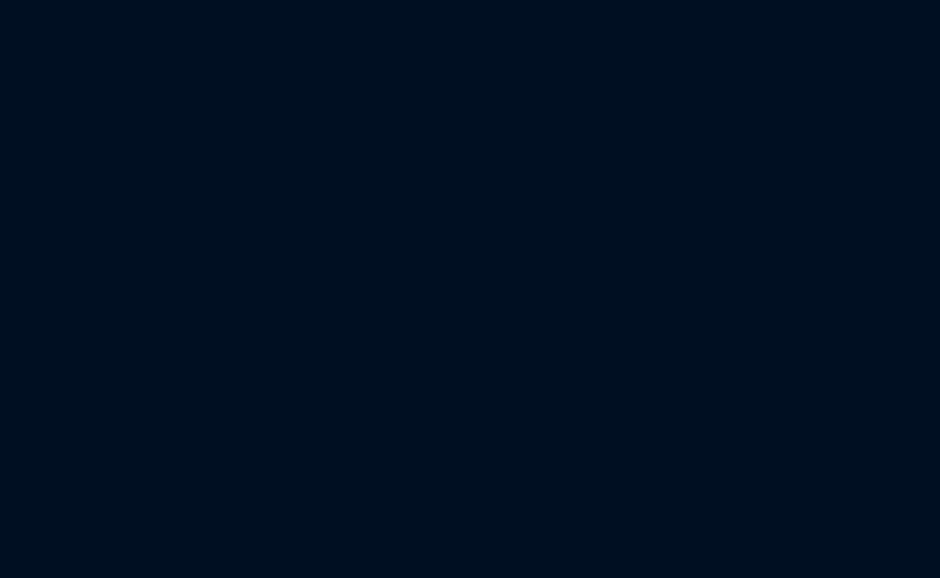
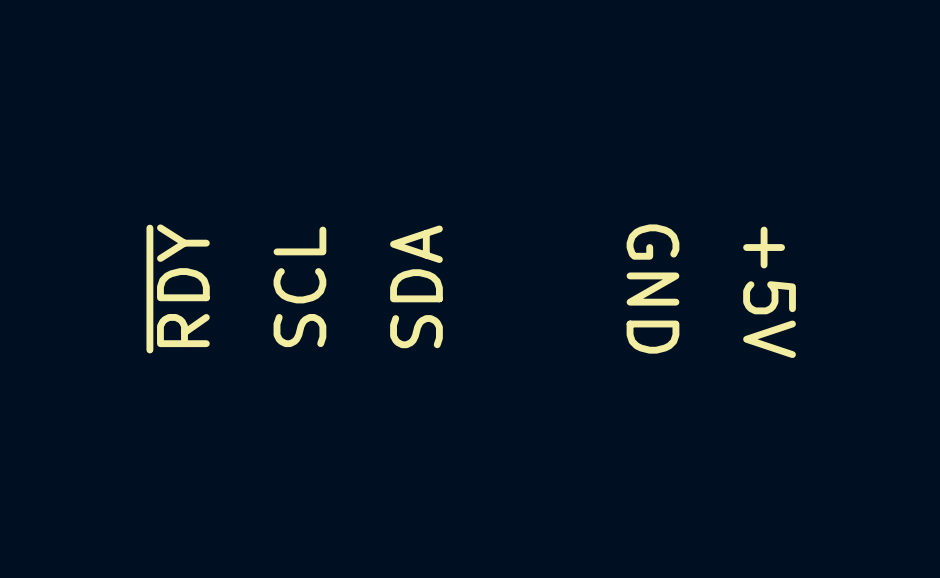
text: none -> SCL (299, 286)
text: none -> SDA (416, 286)
text: none -> ~{RDY} (178, 288)
text: none -> GND (652, 289)
text: none -> +5V (769, 292)

